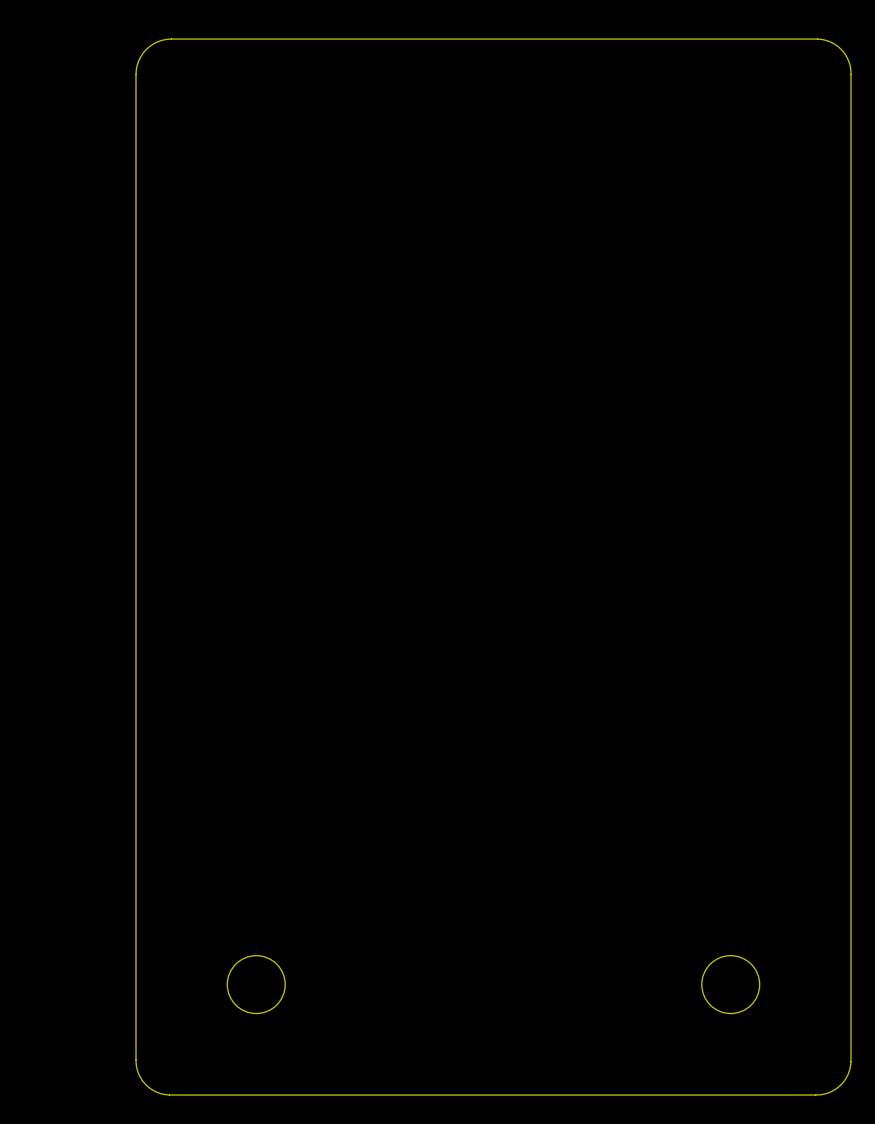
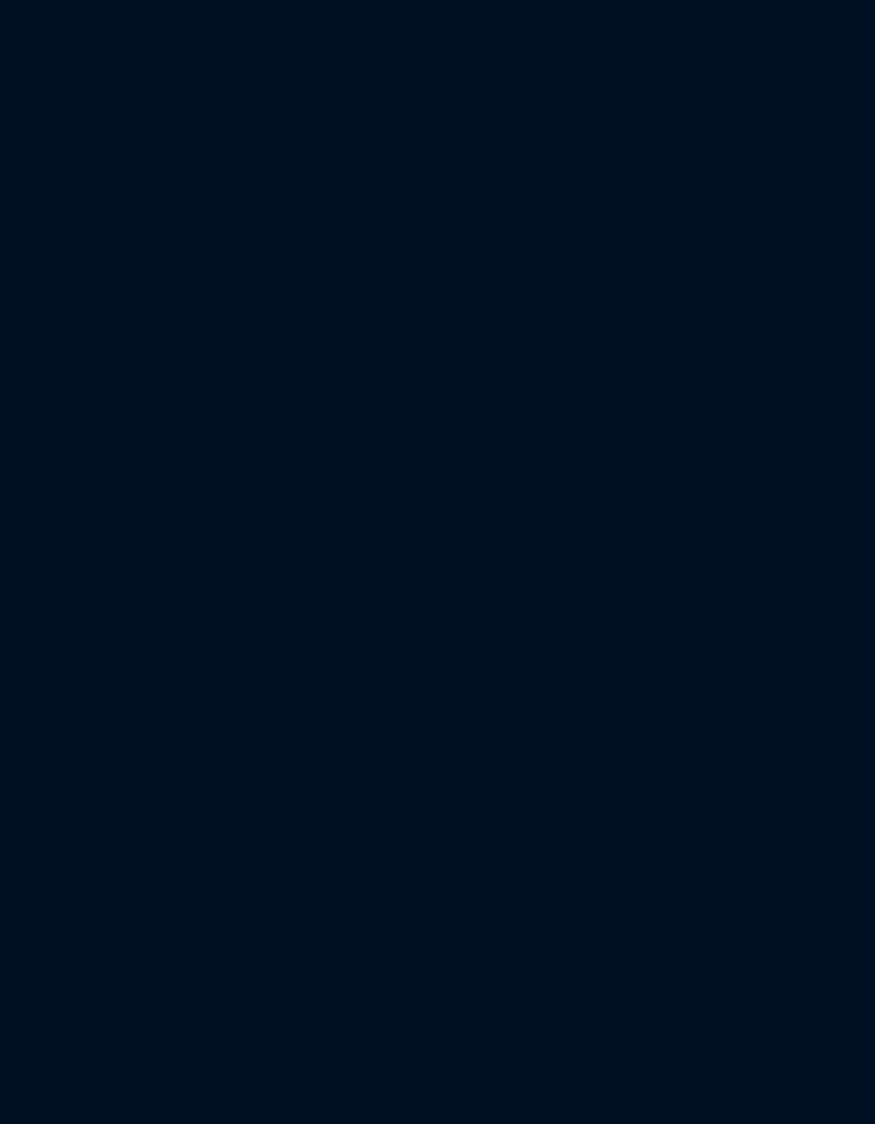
round board edge: [226, 955, 286, 1015] -> none
round board edge: [701, 955, 761, 1015] -> none
board edge: (169, 1095) (156, 1091) (145, 1084) (138, 1072) (135, 1059) (135, 74) (140, 56) (153, 43) (171, 39) (817, 39) (834, 44) (846, 57) (851, 74) (851, 1061) (845, 1078) (832, 1090) (815, 1095) (169, 1095) -> none

